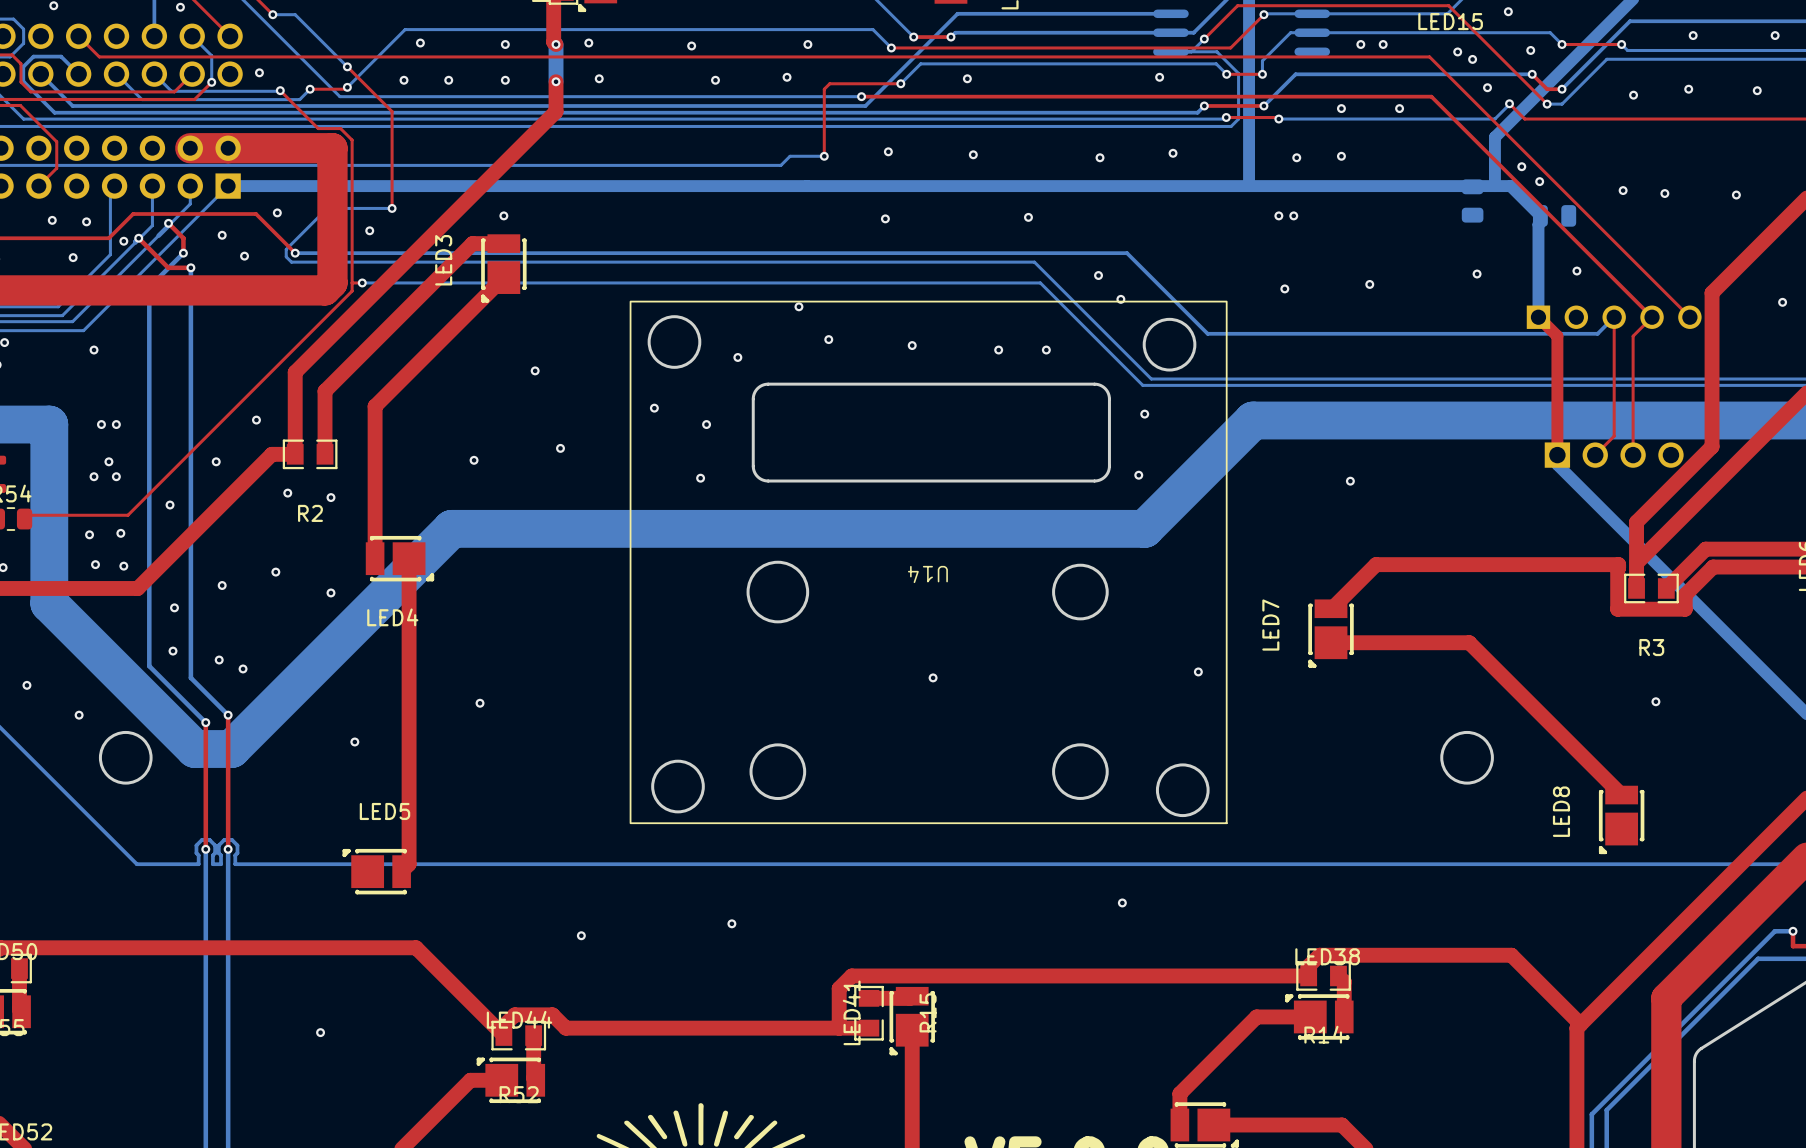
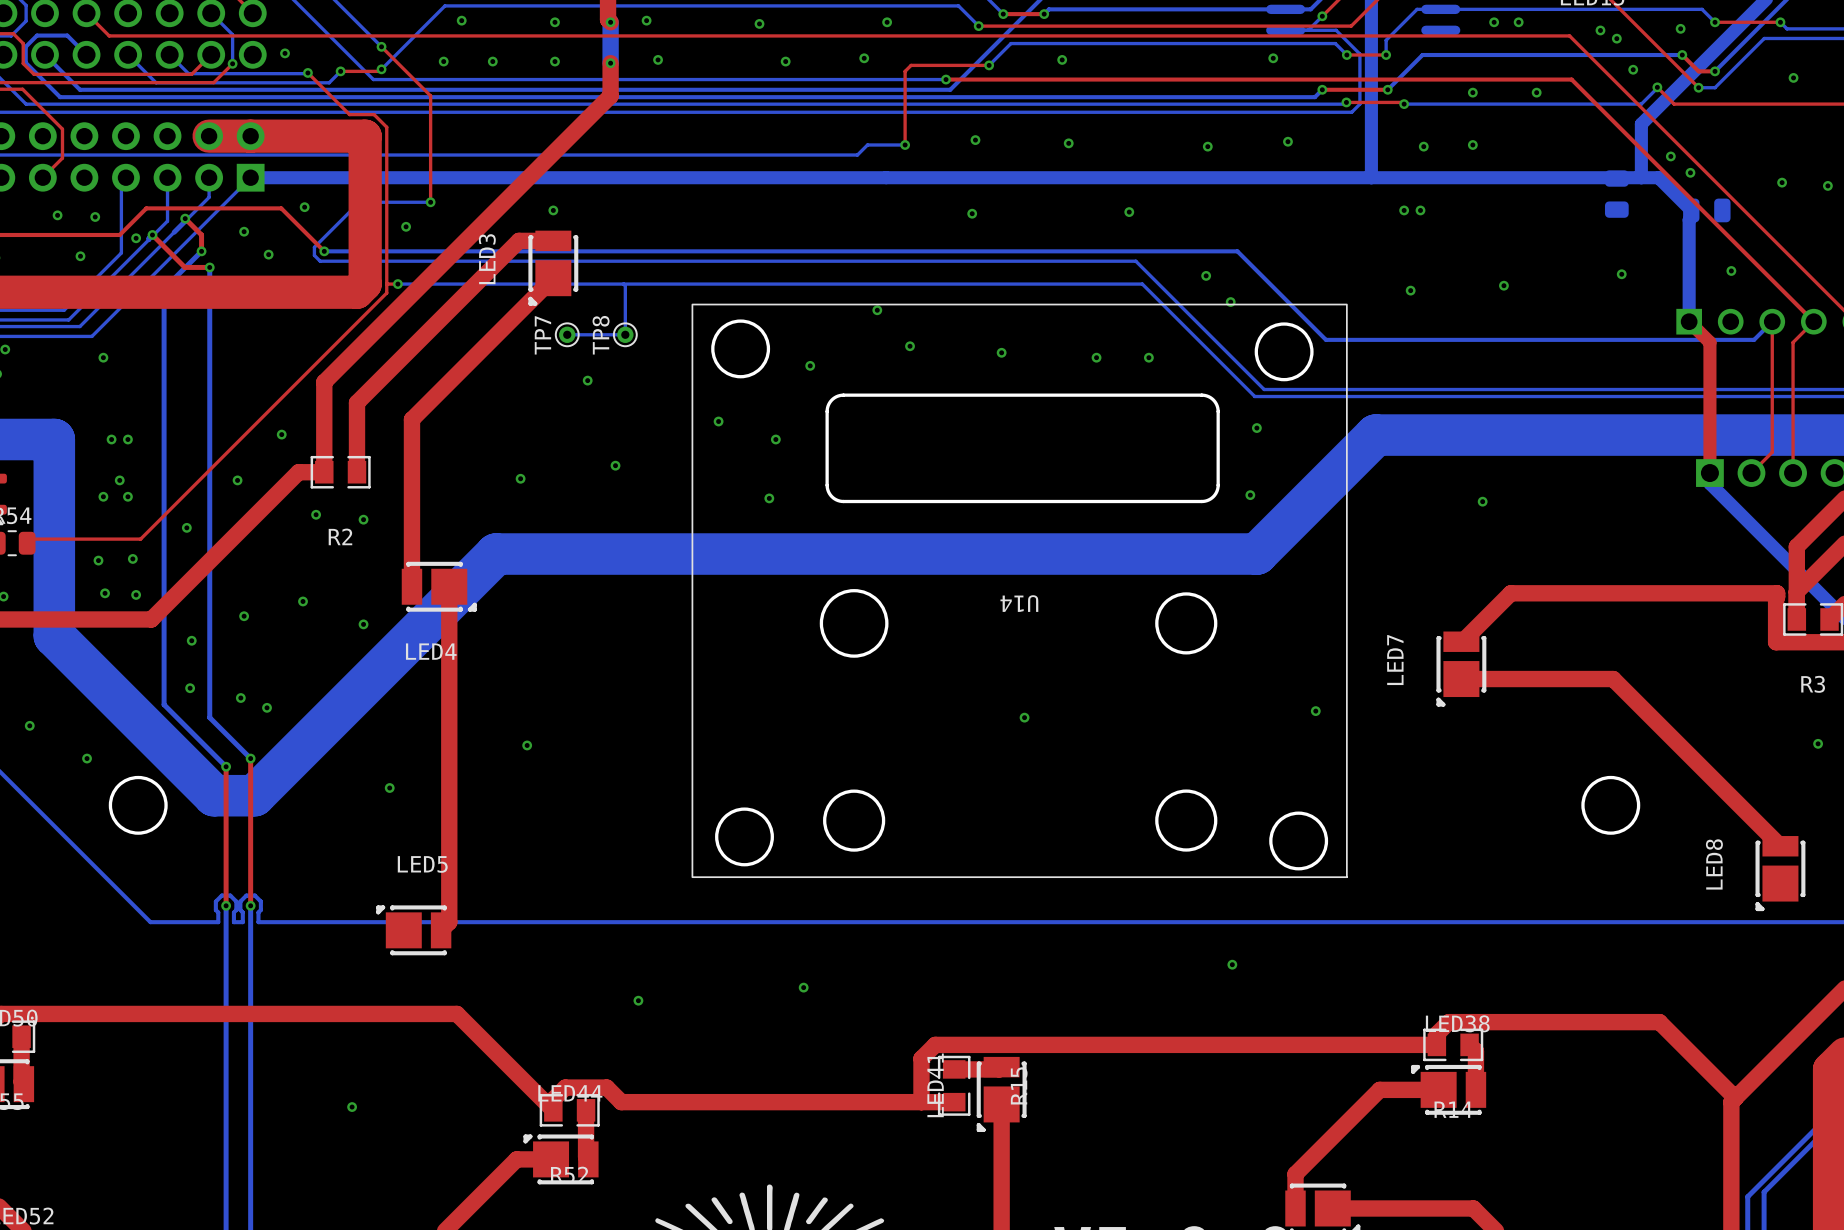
bottom track: none -> (623, 284) (625, 285) (625, 334) (567, 334)
TP7: none -> (567, 334)
TP8: none -> (625, 334)

